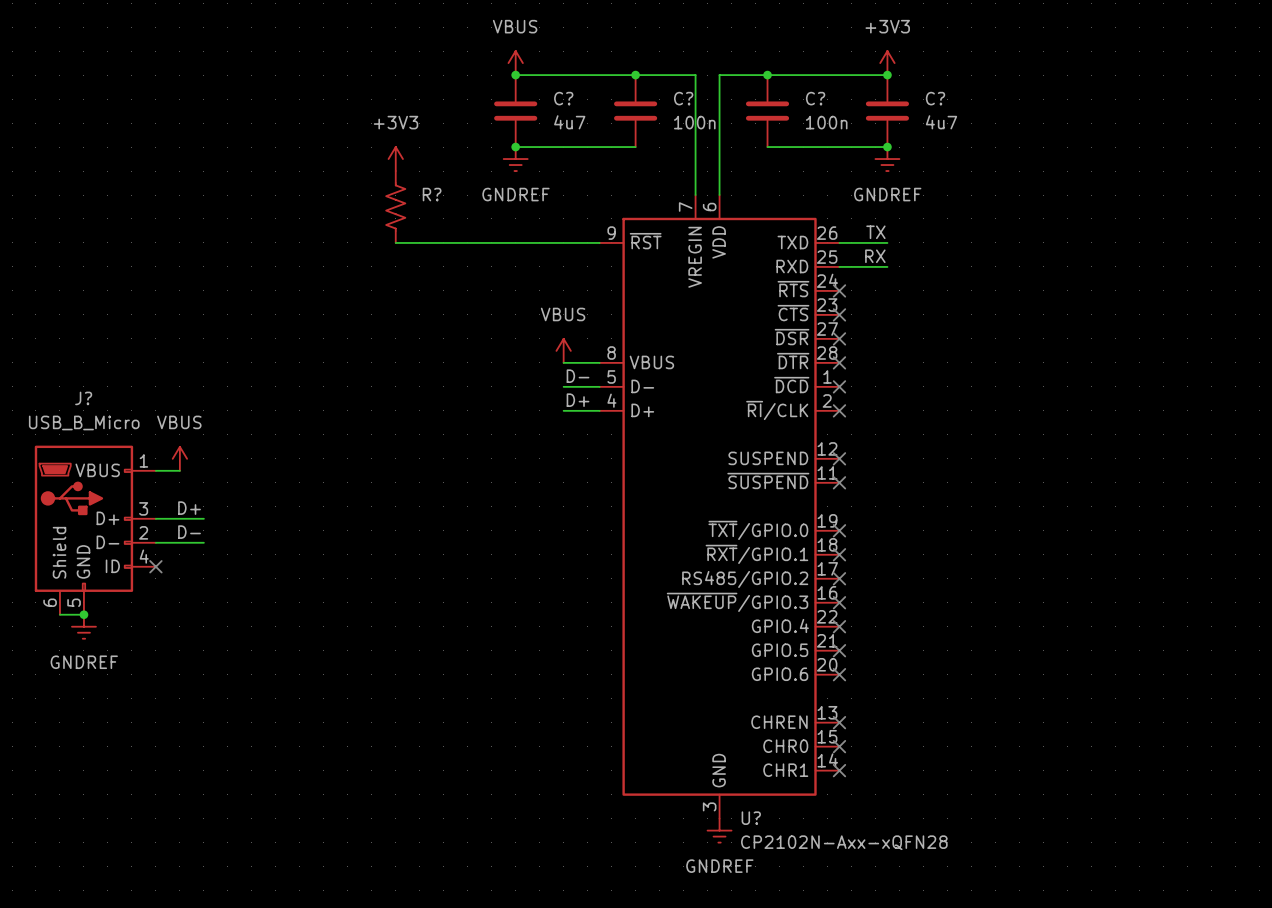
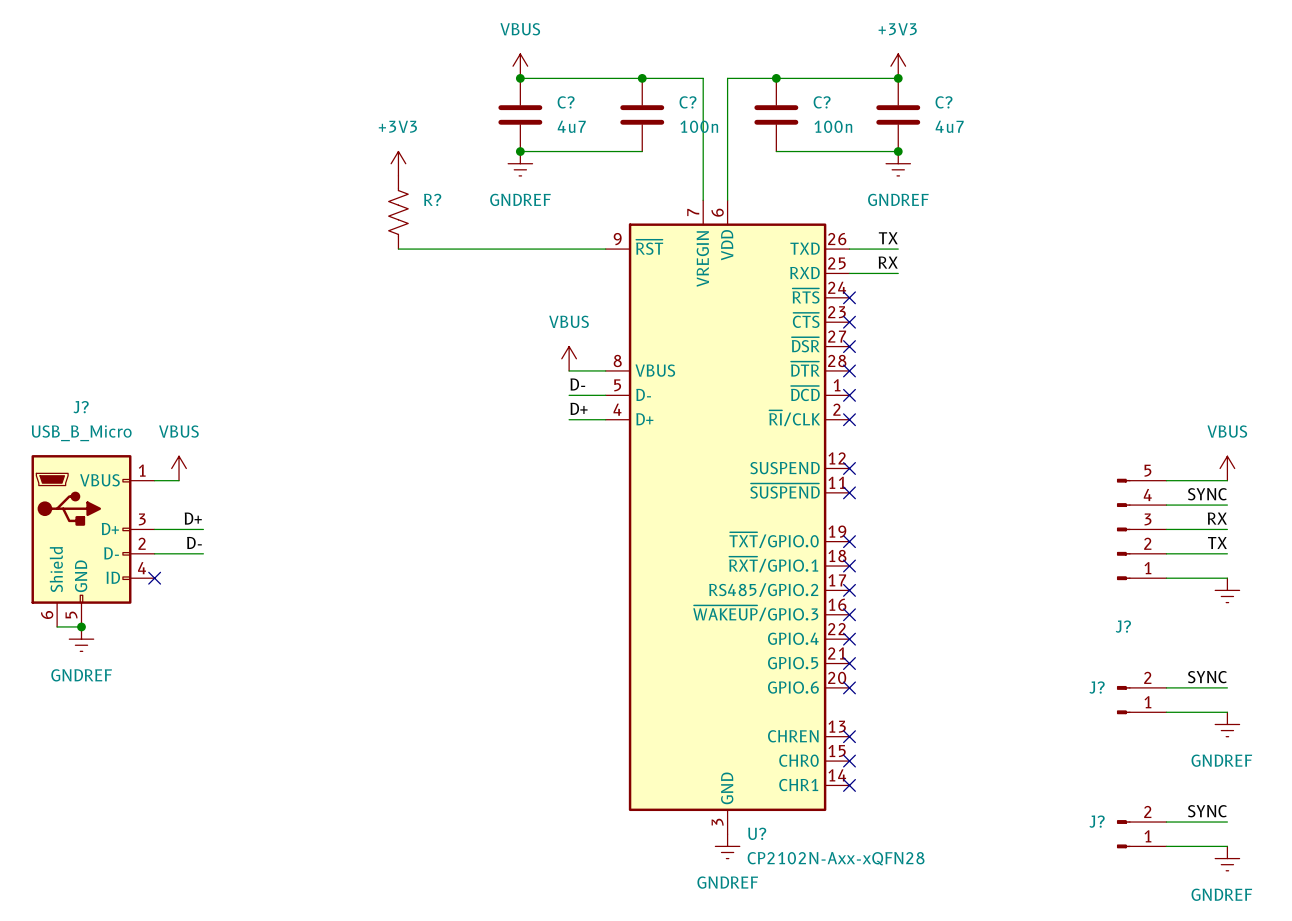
power symbol: none -> VBUS (1227, 468)
wire: none -> (1166, 480) (1227, 480)
label: none -> SYNC (1207, 494)
wire: none -> (1166, 505) (1227, 505)
label: none -> RX (1217, 518)
J?: none -> (1141, 529)
wire: none -> (1166, 529) (1227, 529)
label: none -> TX (1217, 542)
wire: none -> (1166, 553) (1227, 553)
wire: none -> (1166, 578) (1227, 578)
power symbol: none -> (1227, 590)
label: none -> SYNC (1207, 677)
wire: none -> (1166, 687) (1227, 687)
J?: none -> (1141, 700)
wire: none -> (1166, 712) (1227, 712)
power symbol: none -> GNDREF (1227, 724)
label: none -> SYNC (1207, 811)
wire: none -> (1166, 822) (1227, 822)
J?: none -> (1141, 834)
wire: none -> (1166, 846) (1227, 846)
power symbol: none -> GNDREF (1227, 858)

